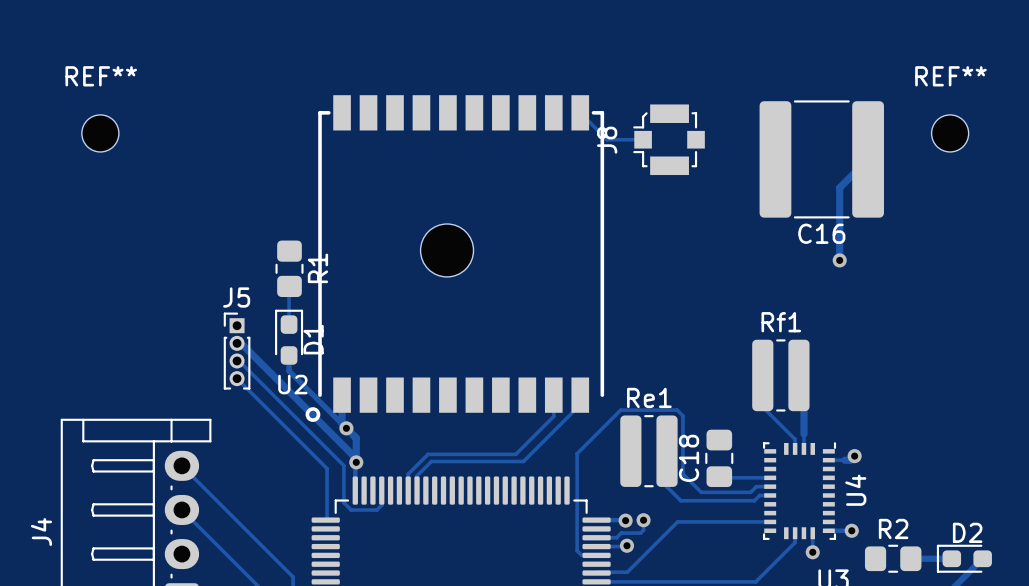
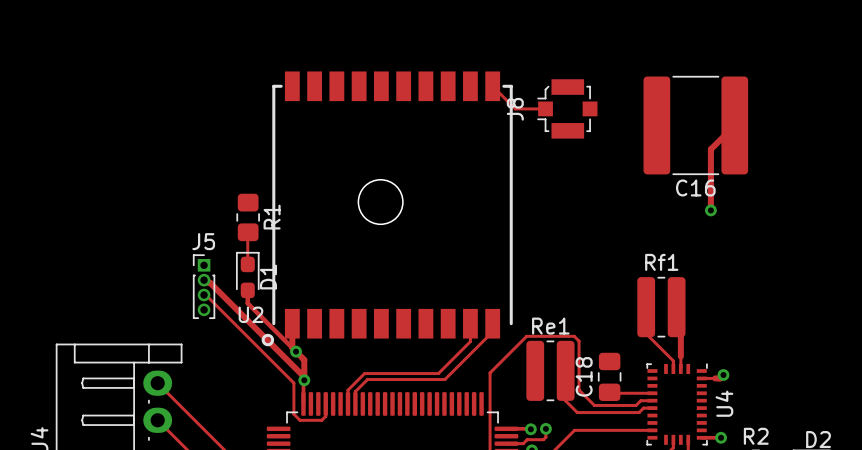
REF**: (100, 133) -> none
REF**: (950, 133) -> none
track: (237, 378) (327, 468) (325, 520) -> none

